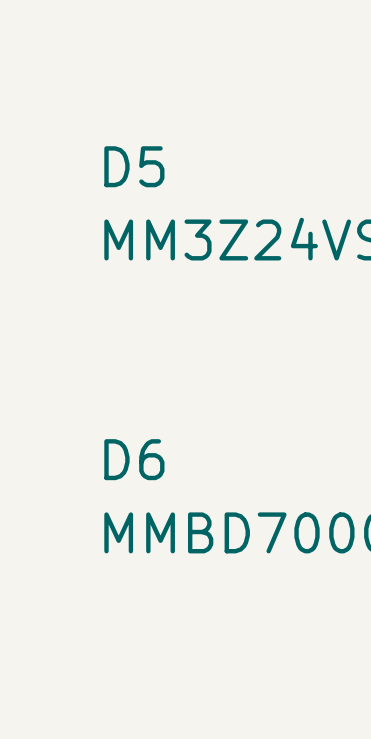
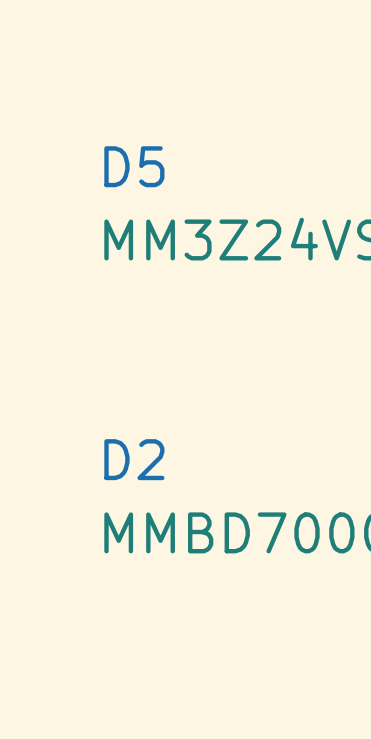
D6 name: D6 (134, 459) -> D2 (134, 459)

